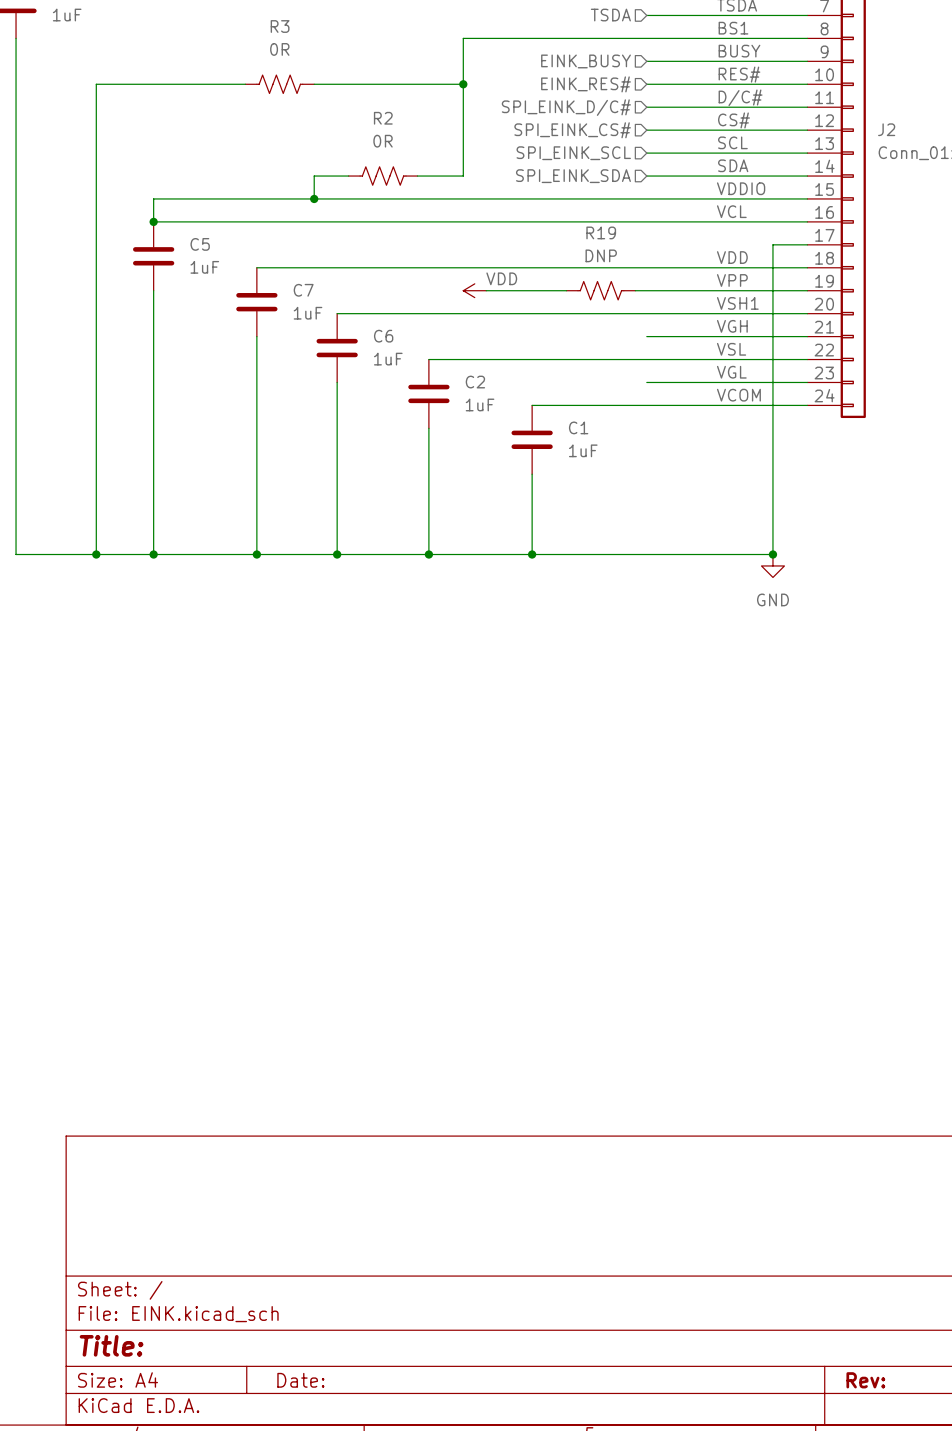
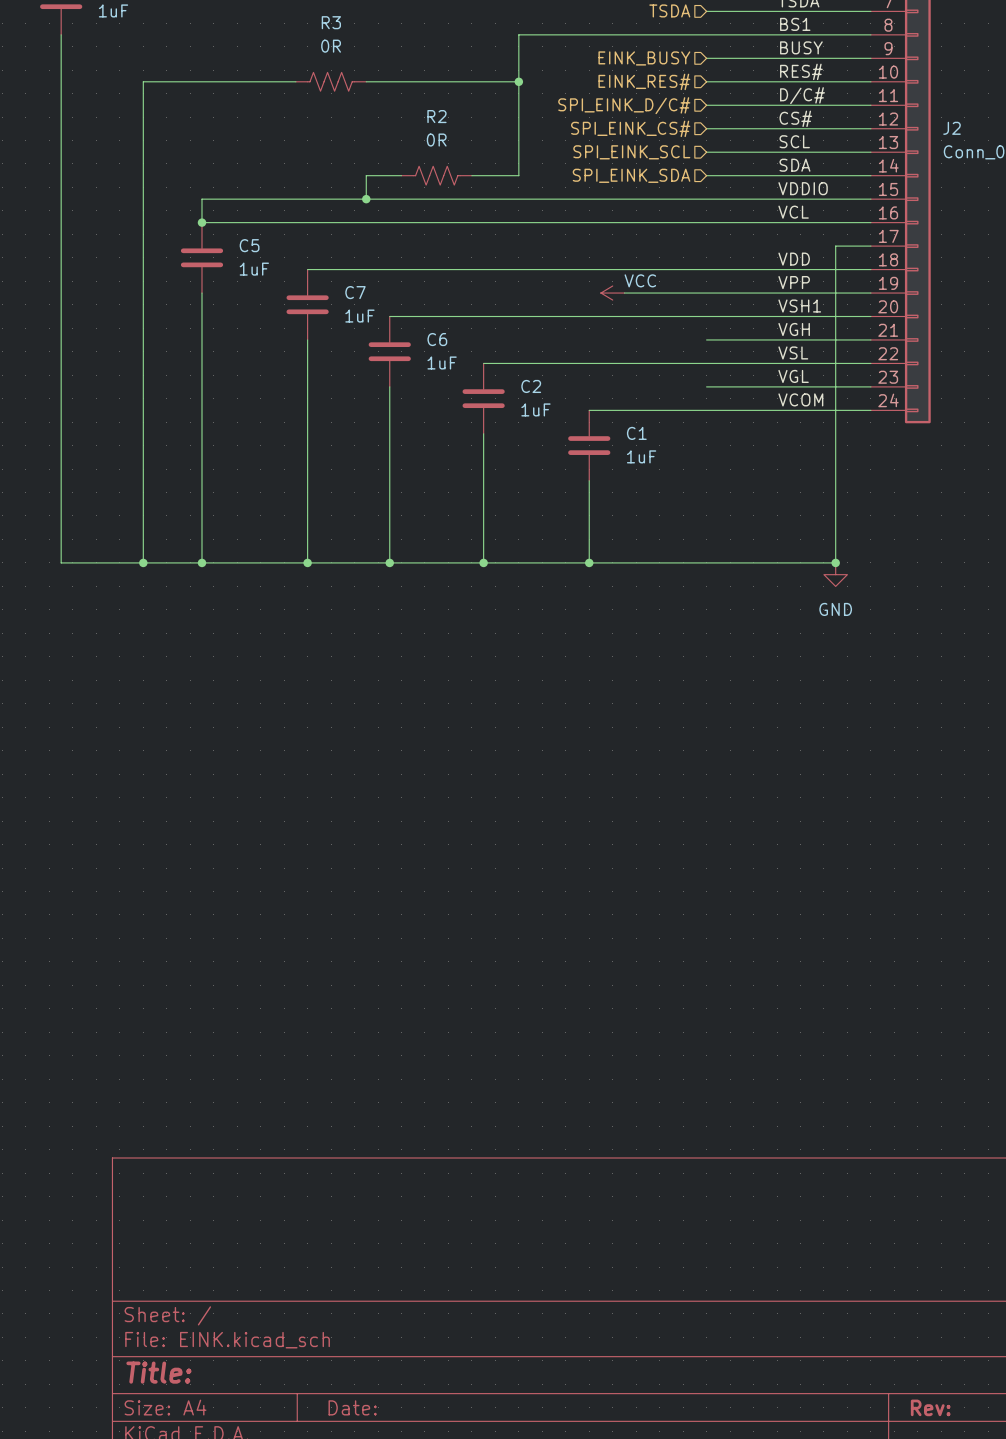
power symbol: VDD (474, 290) -> none
wire: (486, 290) (566, 290) -> (694, 293) (624, 293)
power symbol: none -> VCC (612, 293)
R19: DNP (600, 290) -> none

